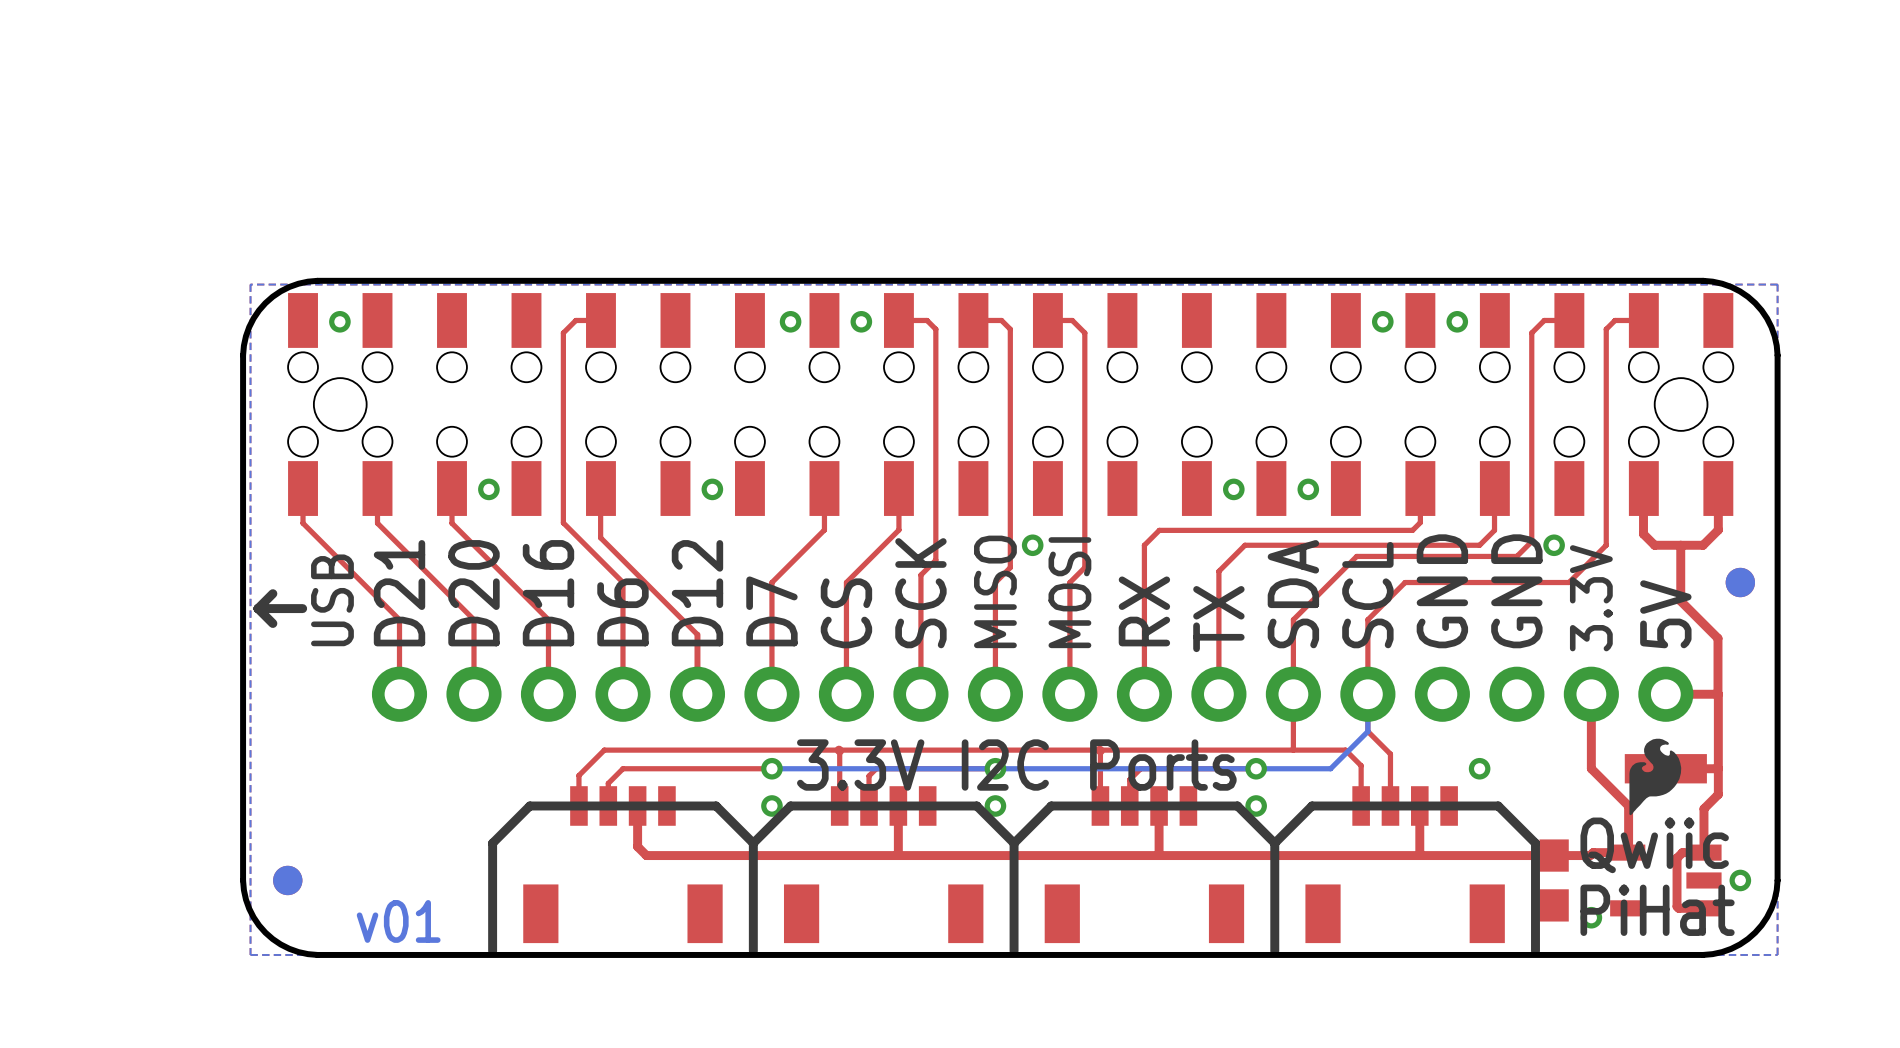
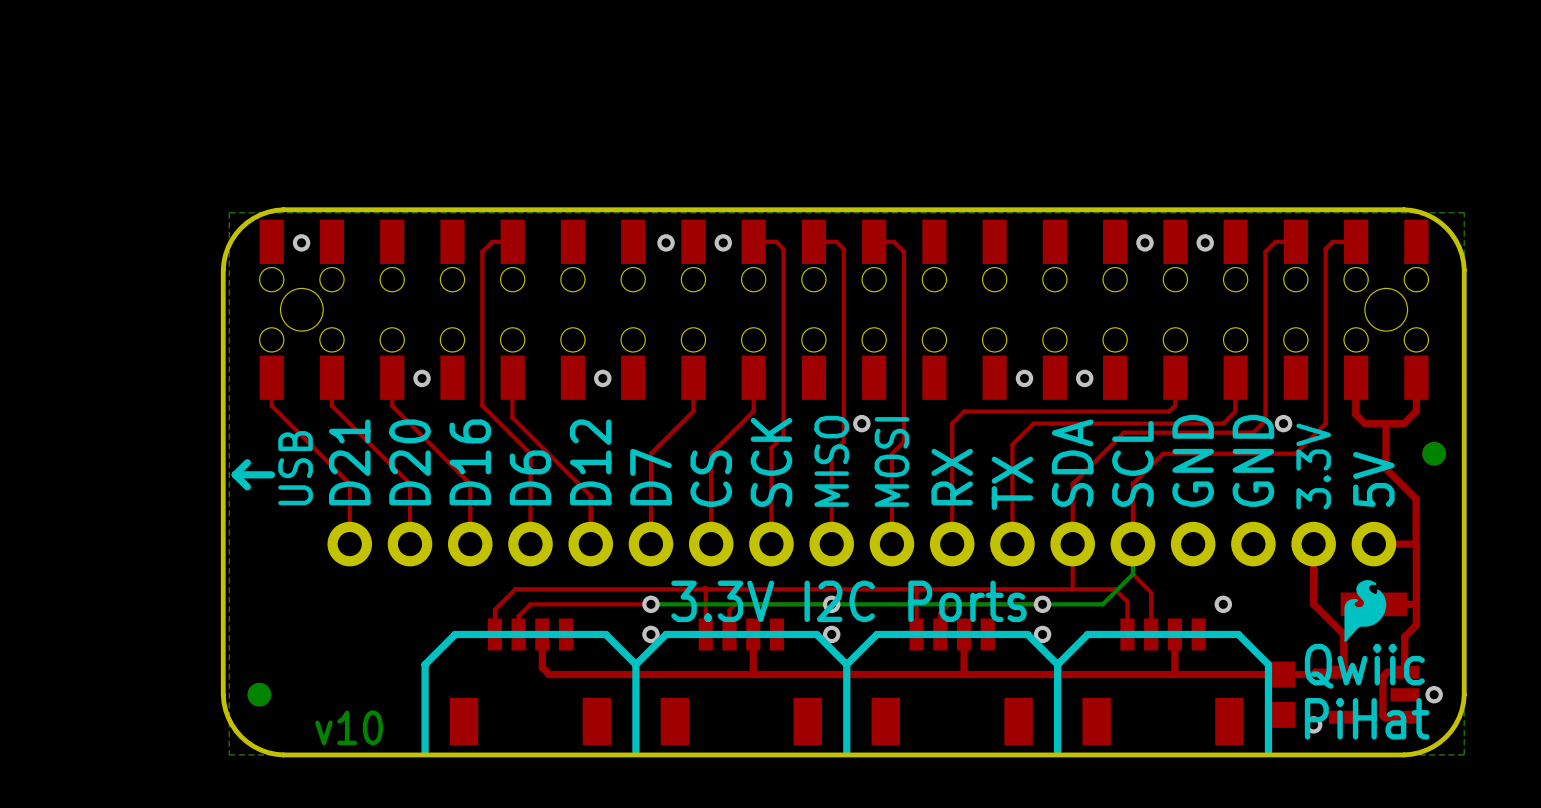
text: v01 (398, 921) -> v10 (349, 727)

